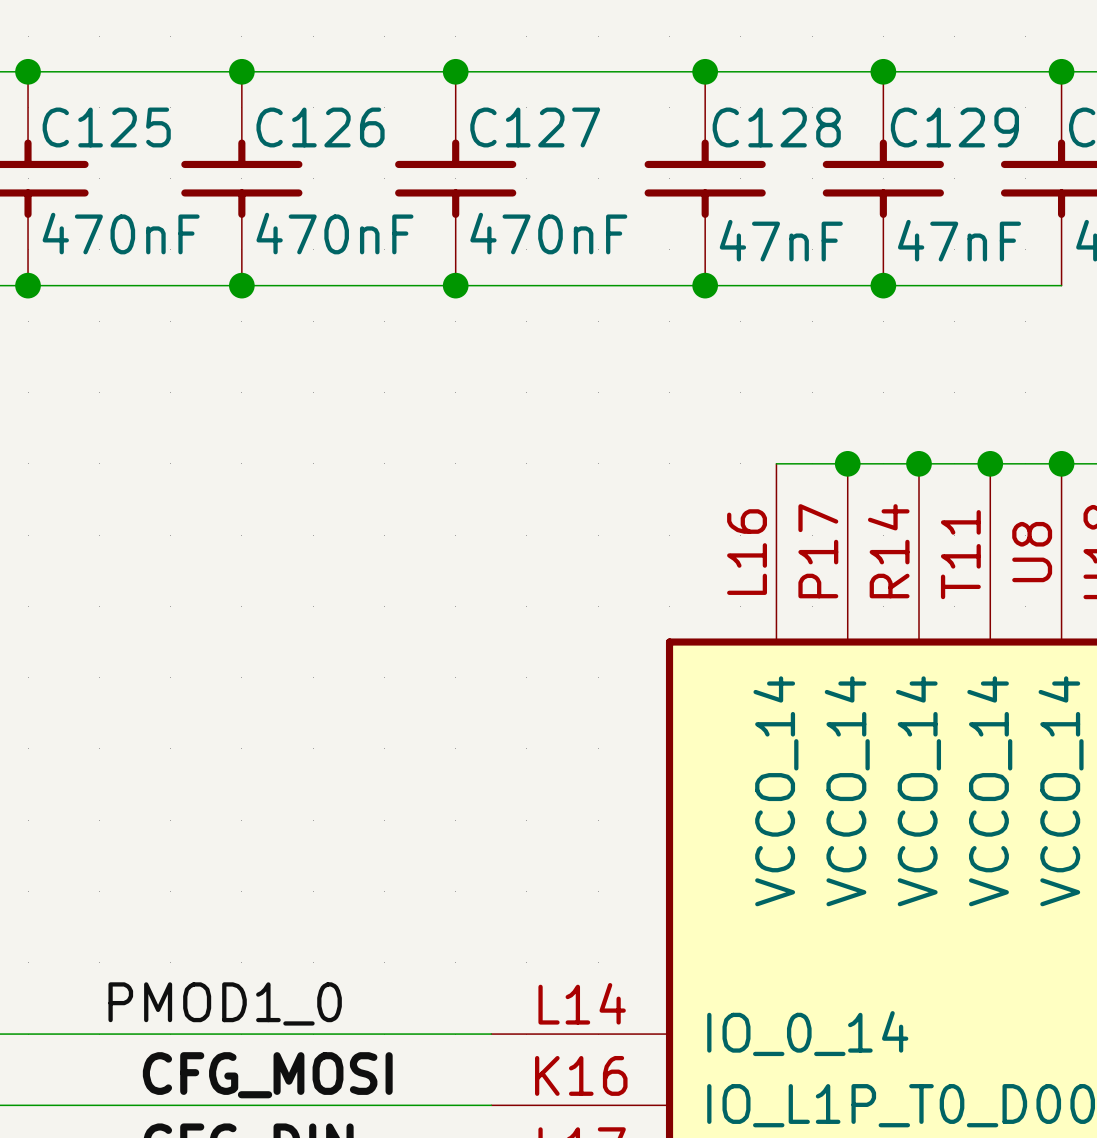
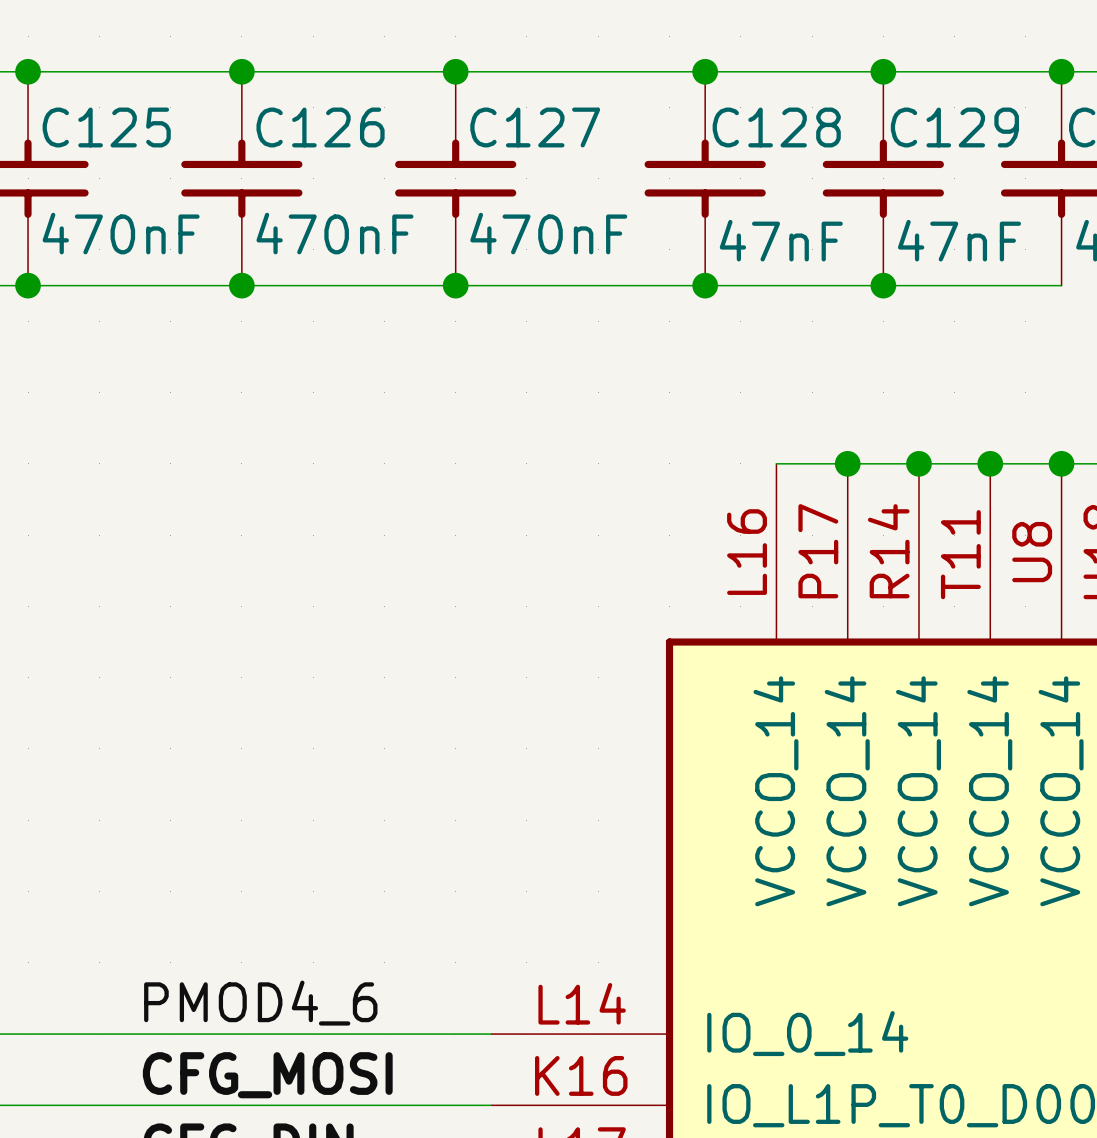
label: PMOD1_0 (225, 1003) -> PMOD4_6 (260, 1003)

